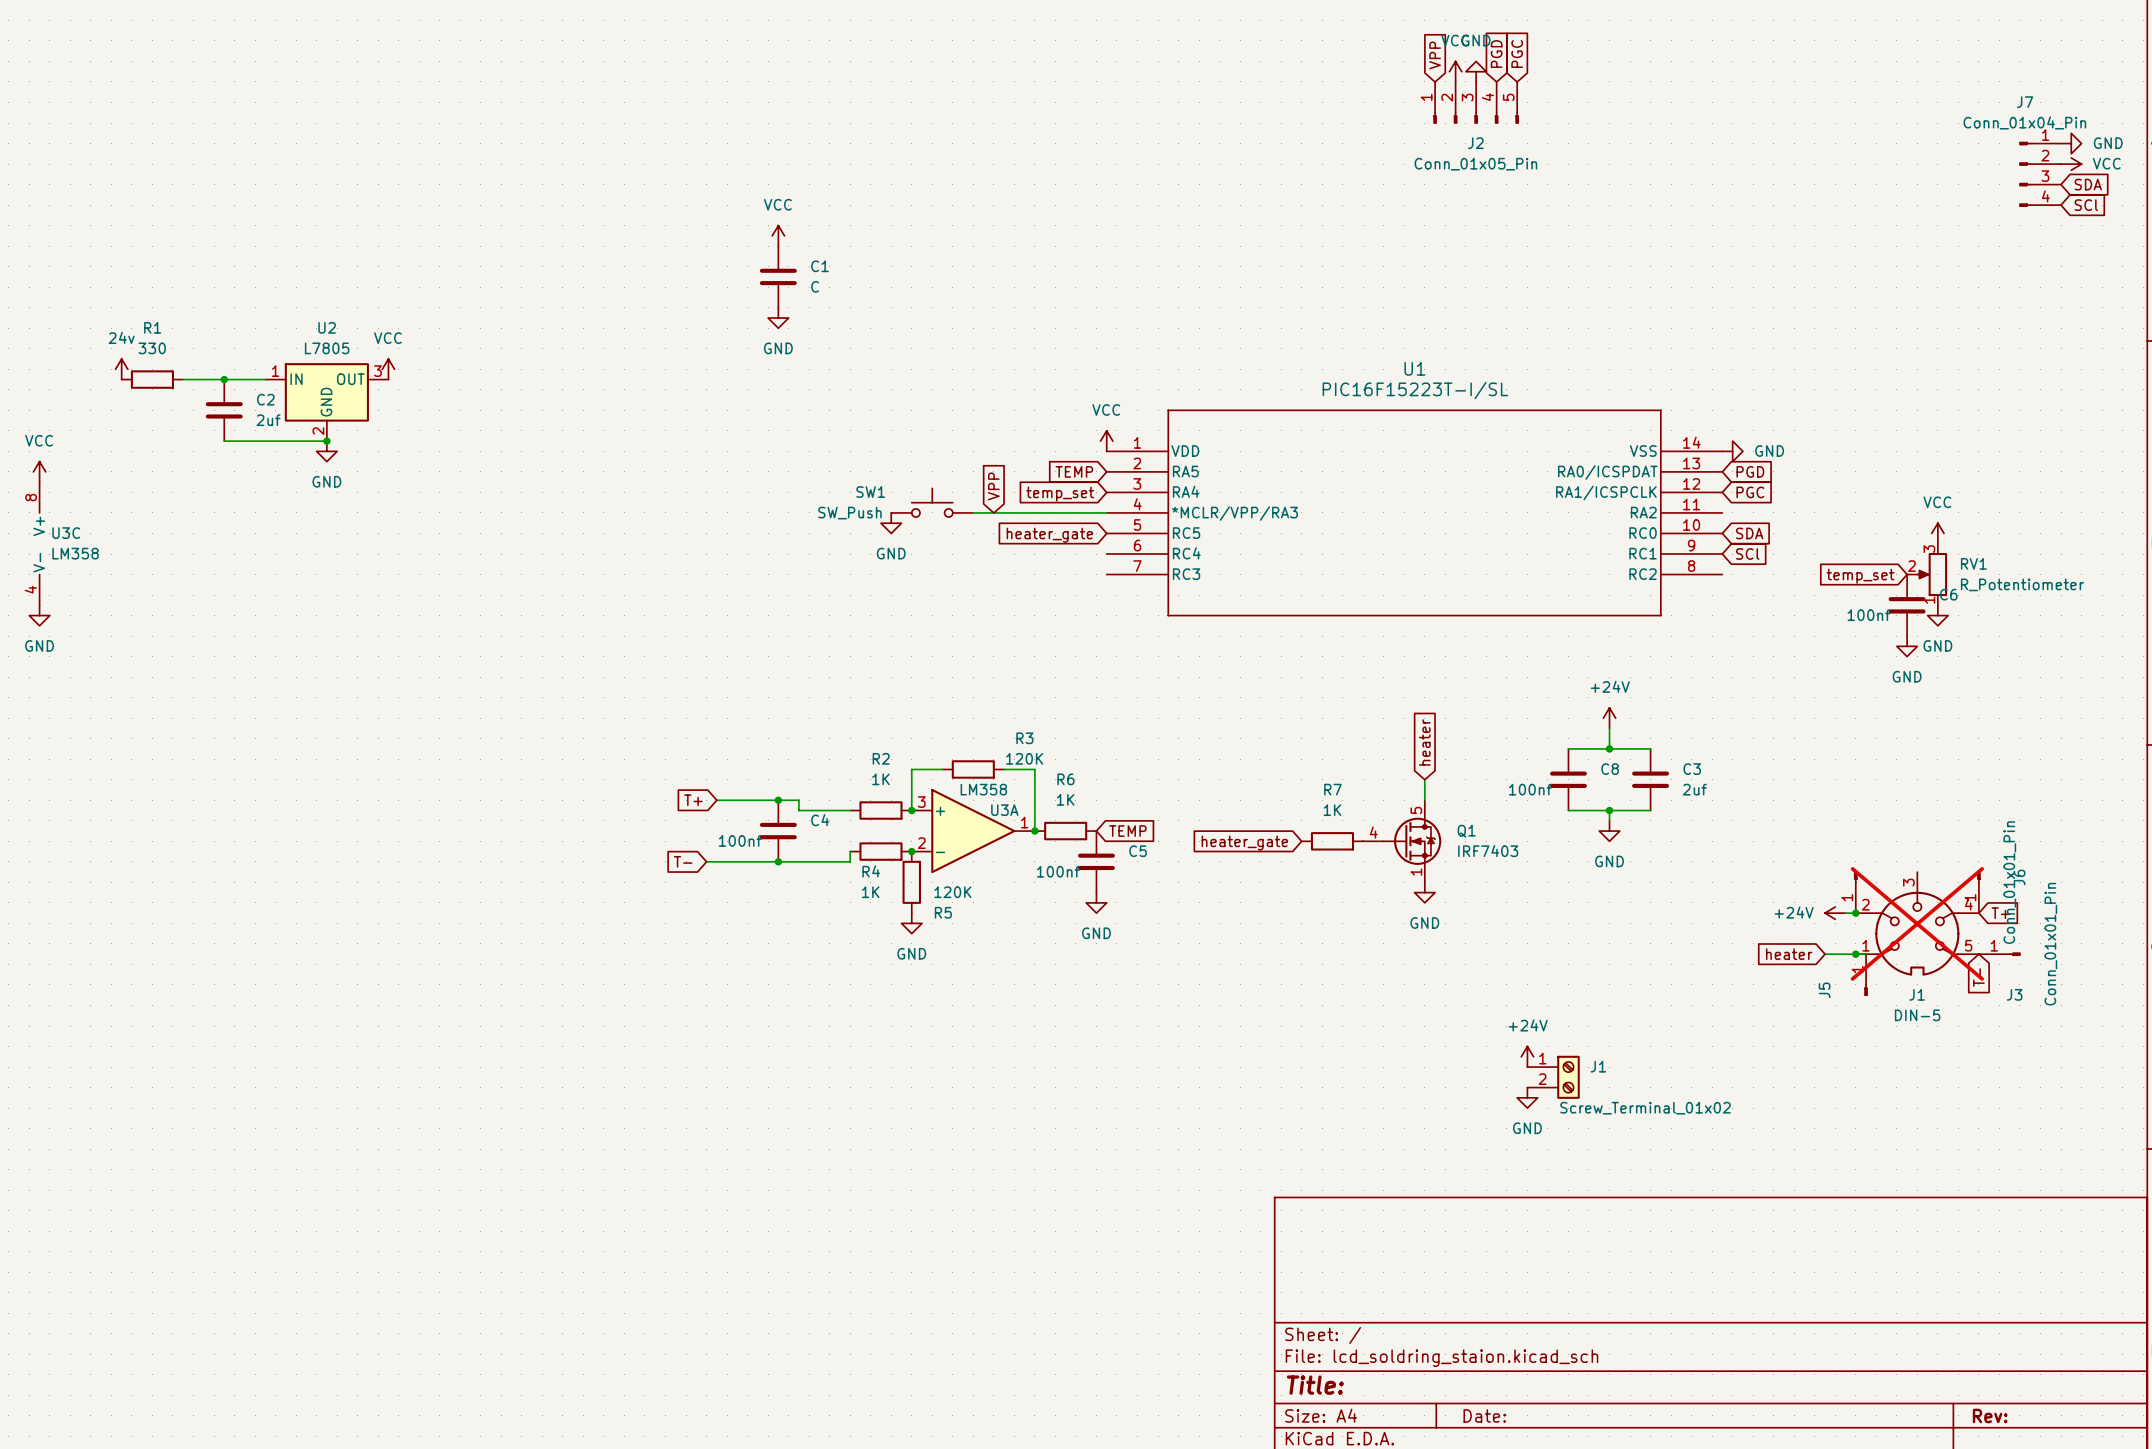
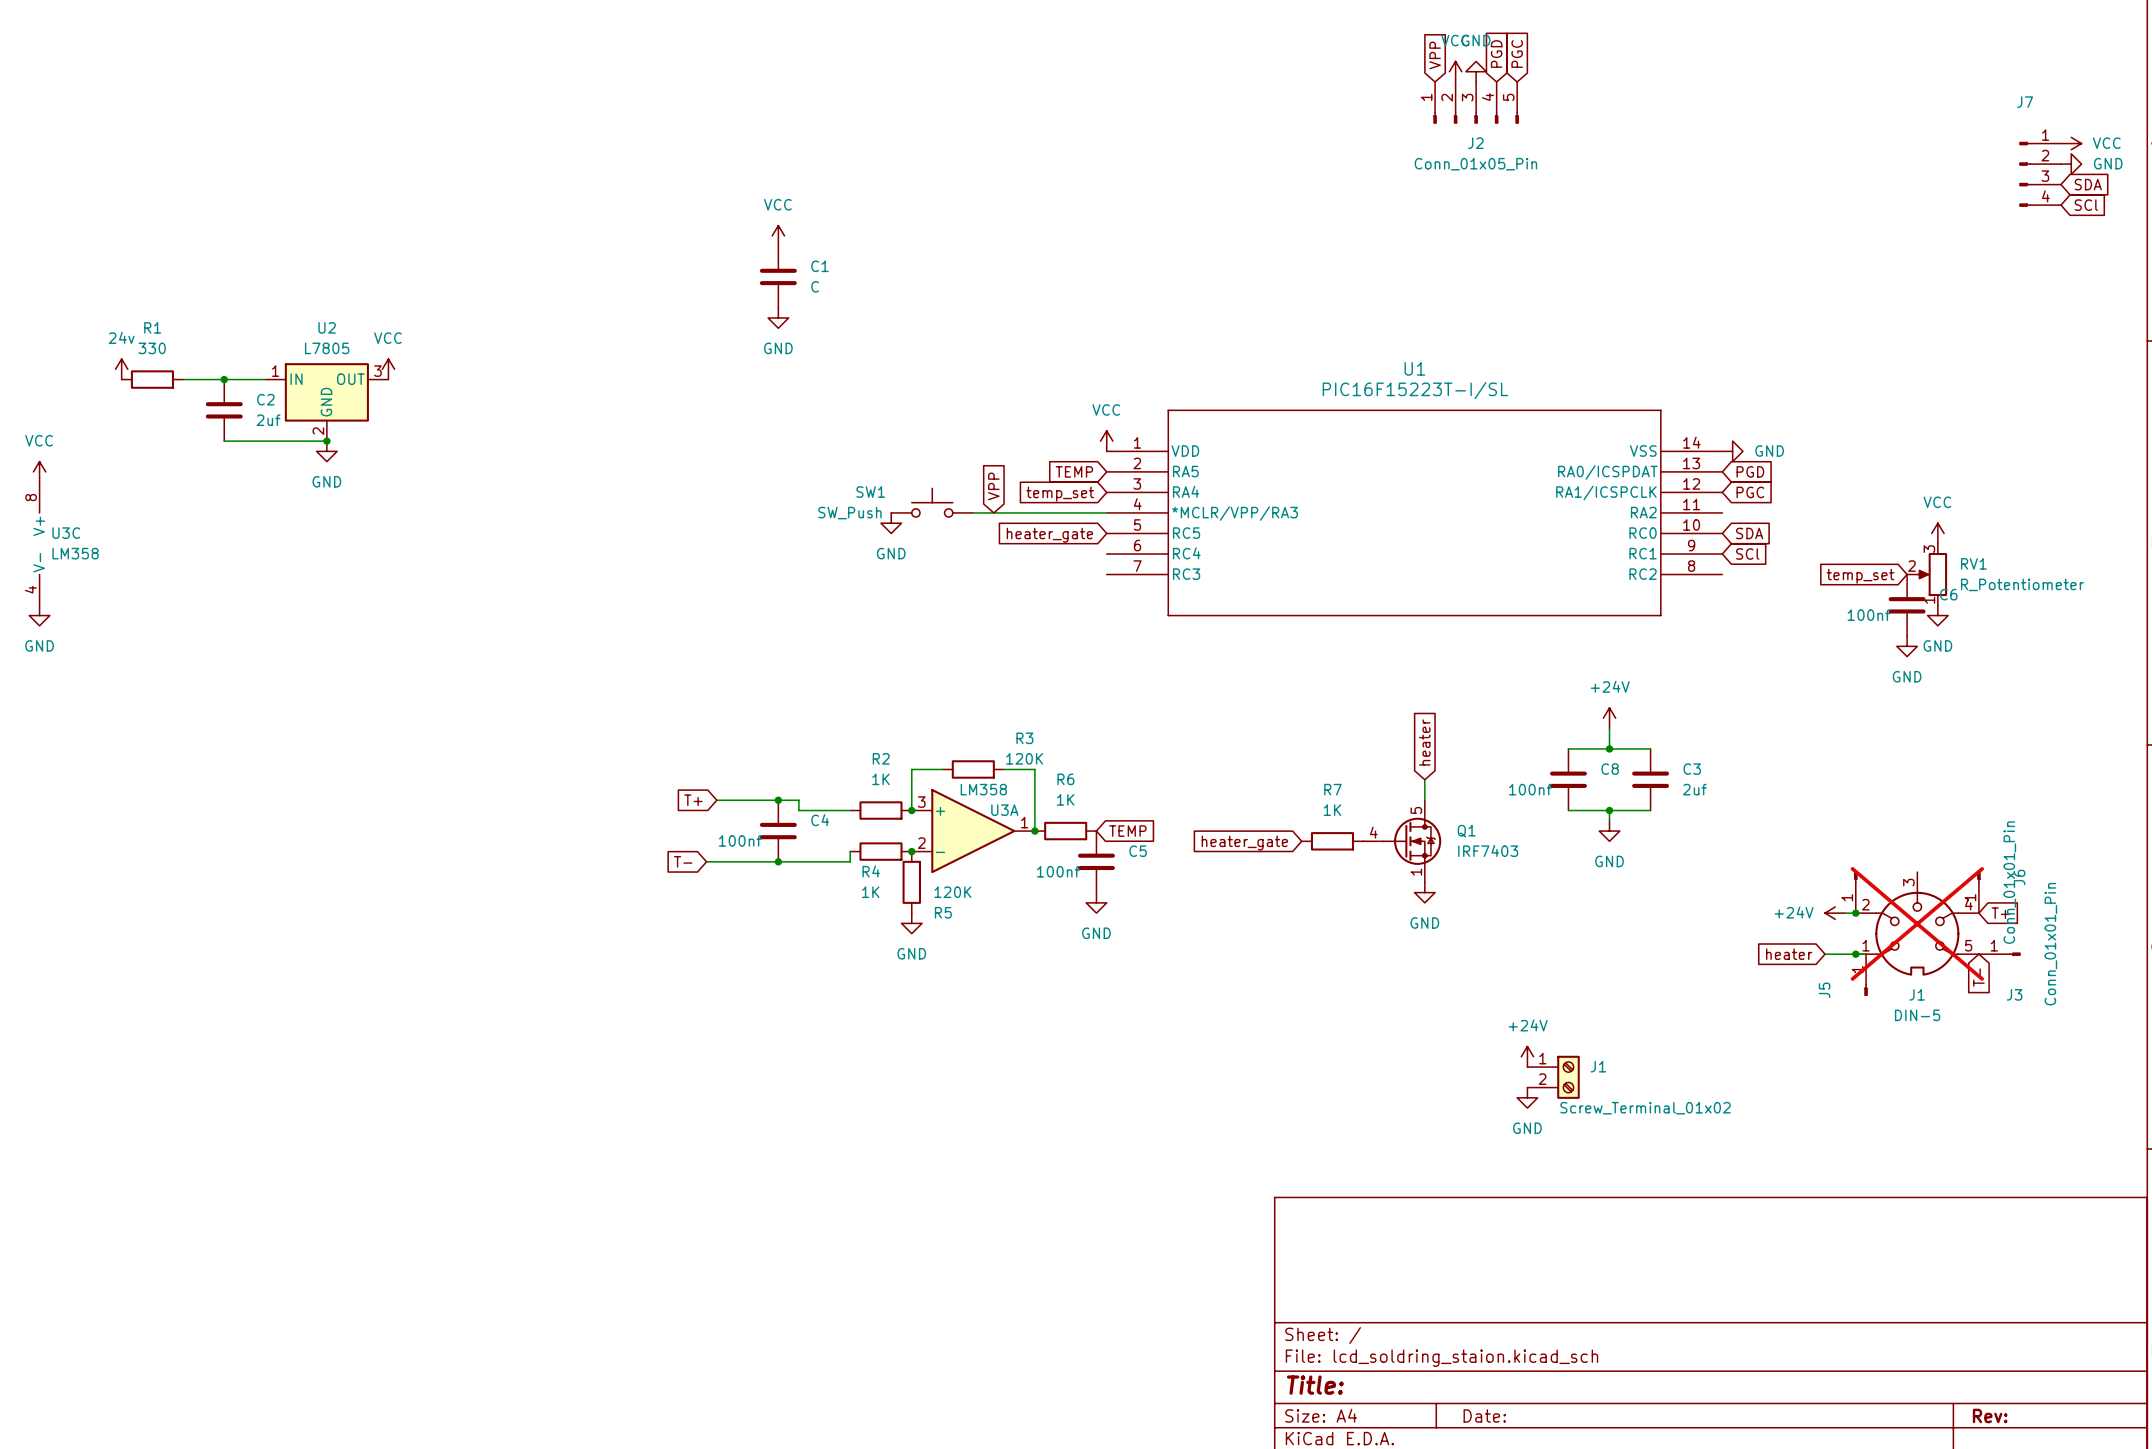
J7 value: Conn_01x04_Pin (2024, 122) -> none
power symbol: GND (2071, 143) -> VCC (2071, 143)
power symbol: VCC (2071, 164) -> GND (2071, 164)

